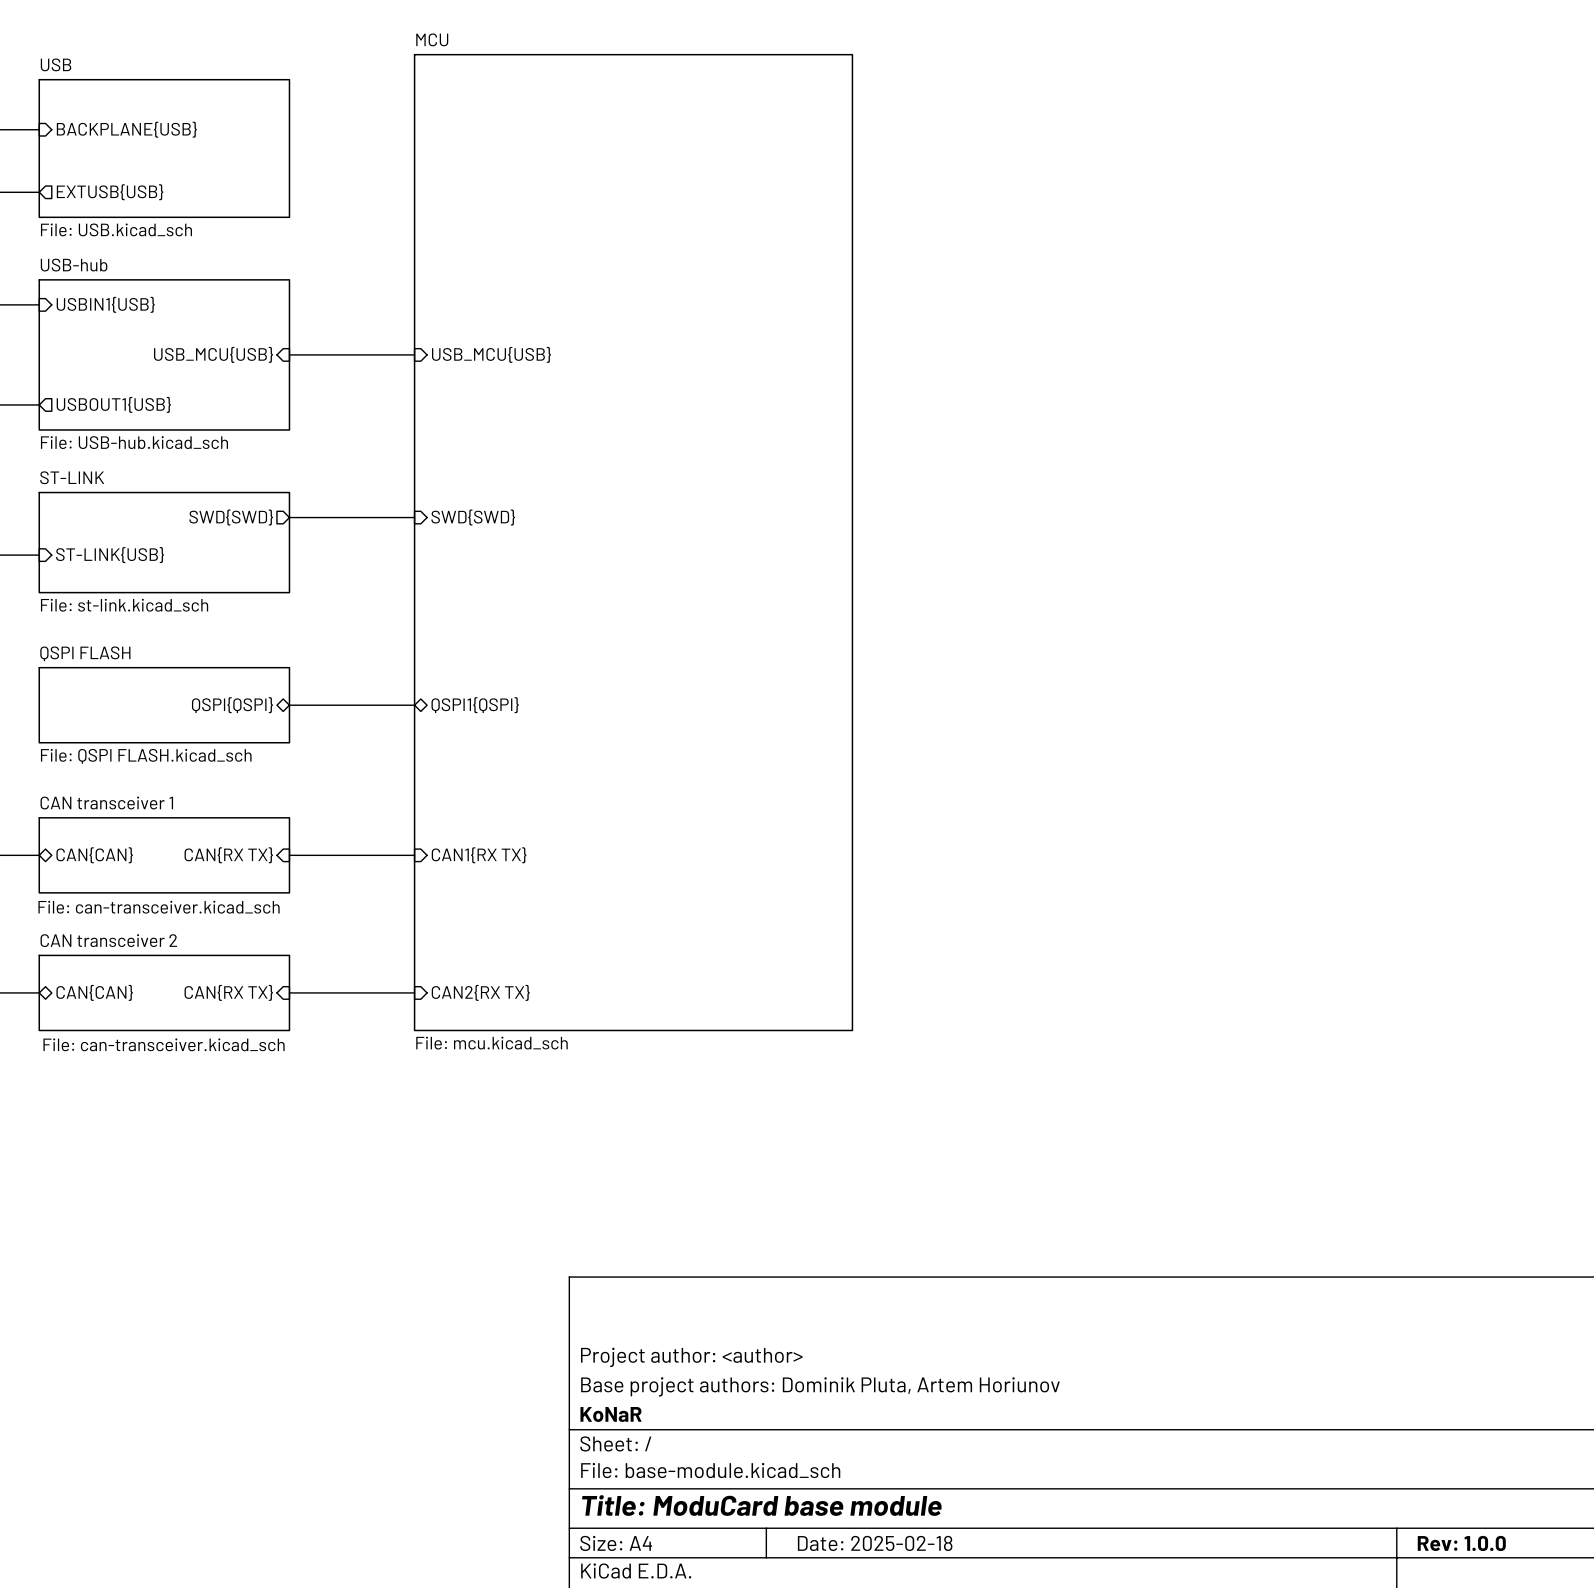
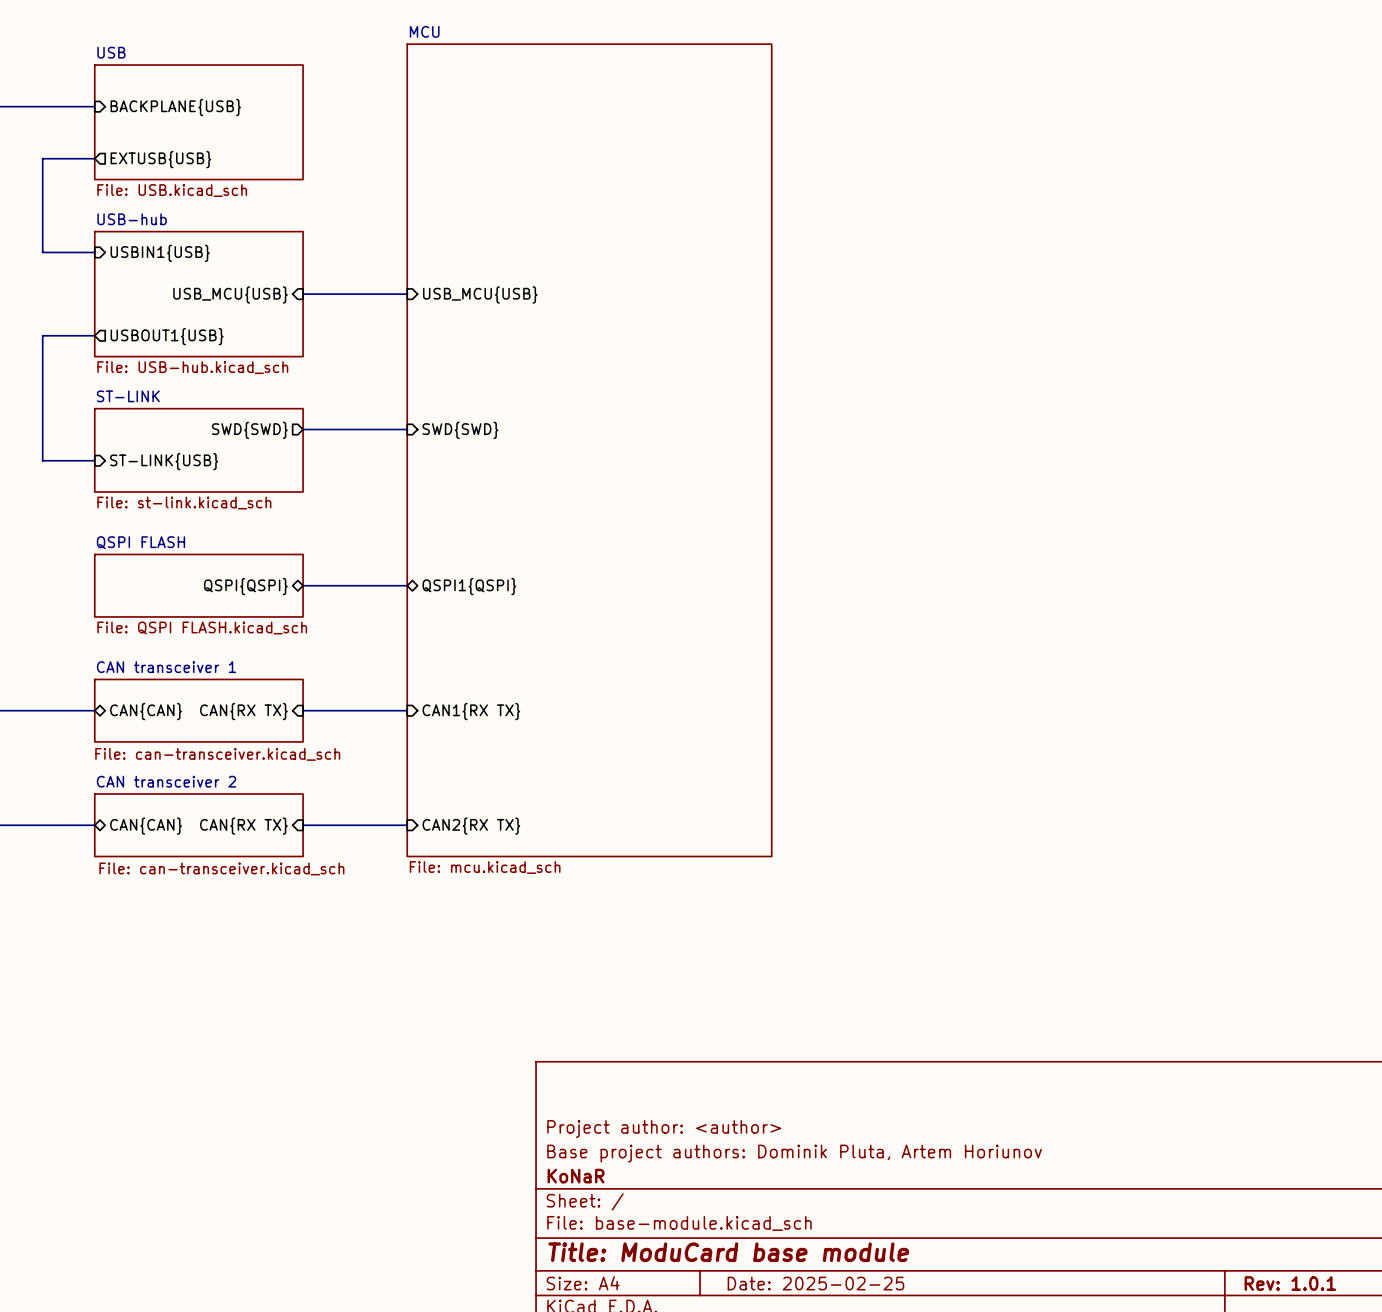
title block: Date: 2025-02-18 (875, 1543) -> Date: 2025-02-25 (815, 1283)
title block: Rev: 1.0.0 (1461, 1543) -> Rev: 1.0.1 (1290, 1283)

